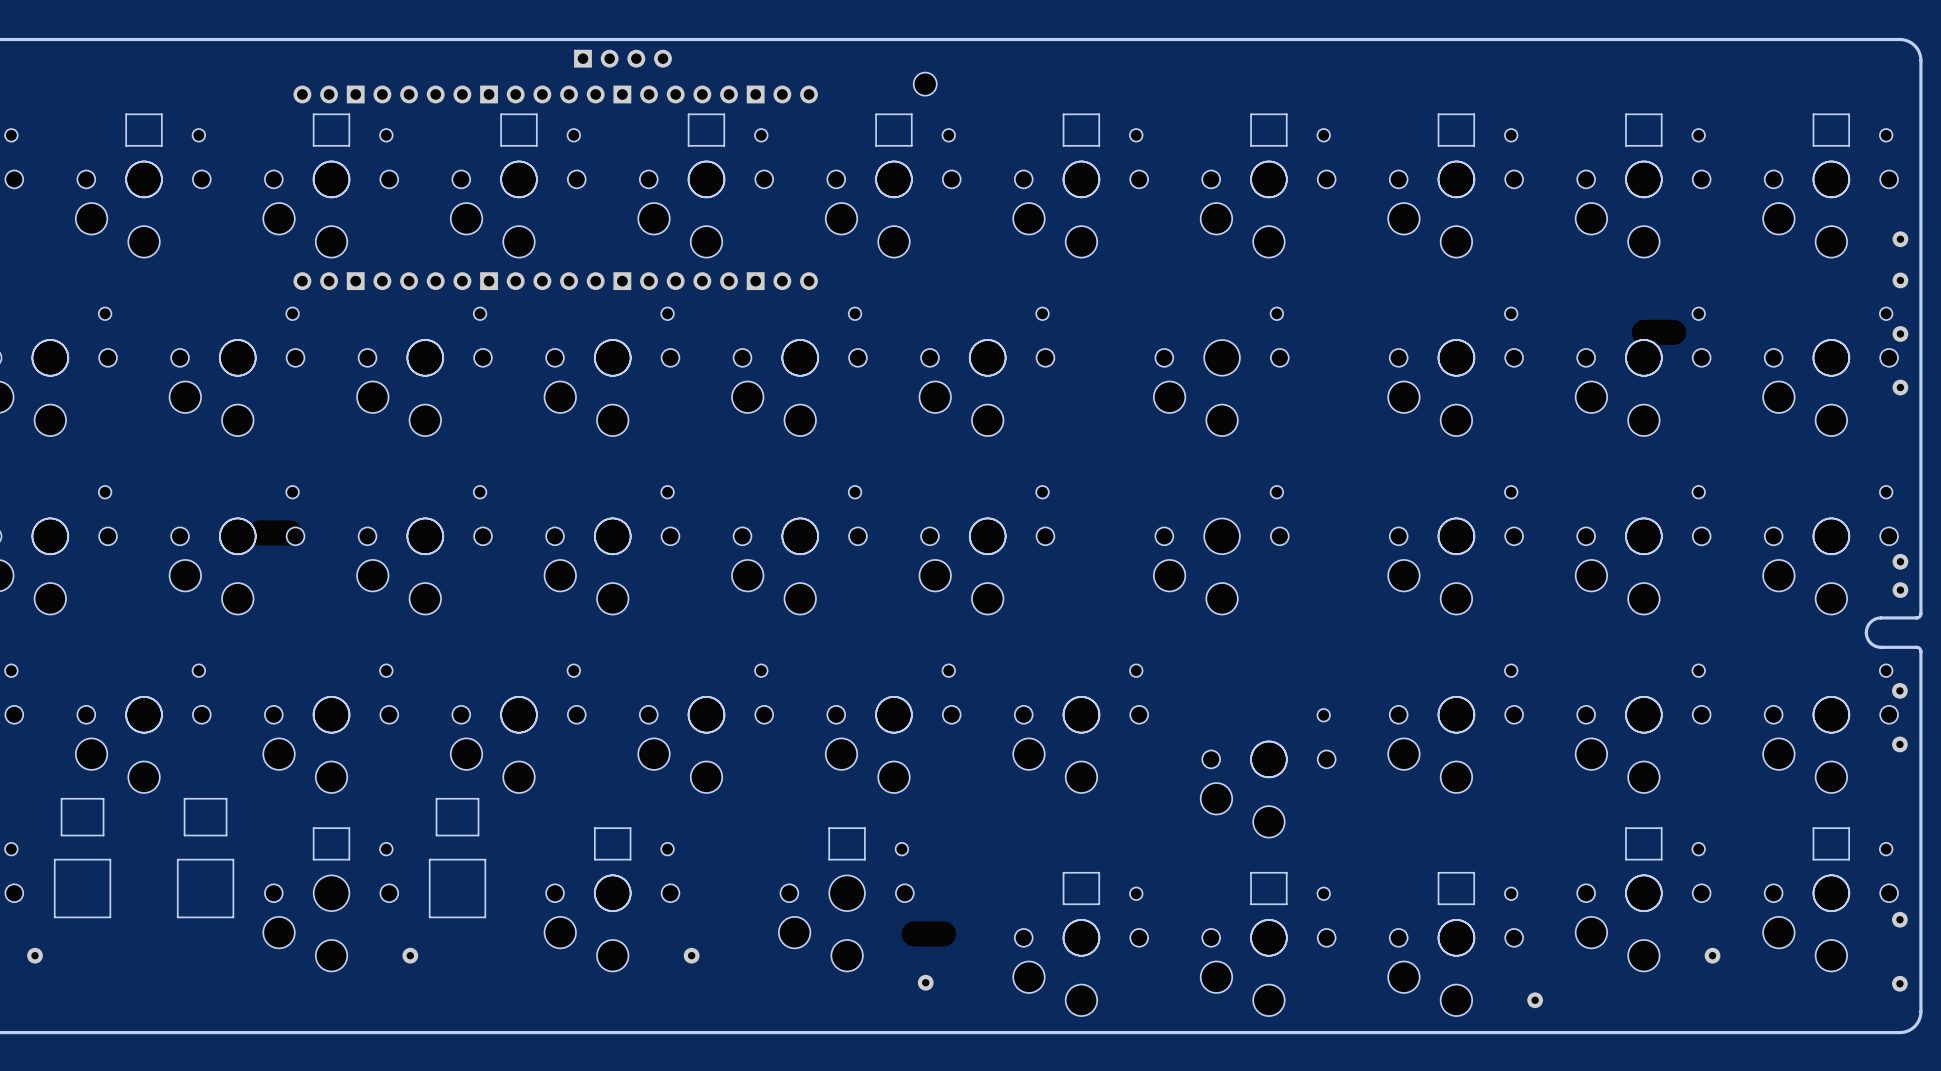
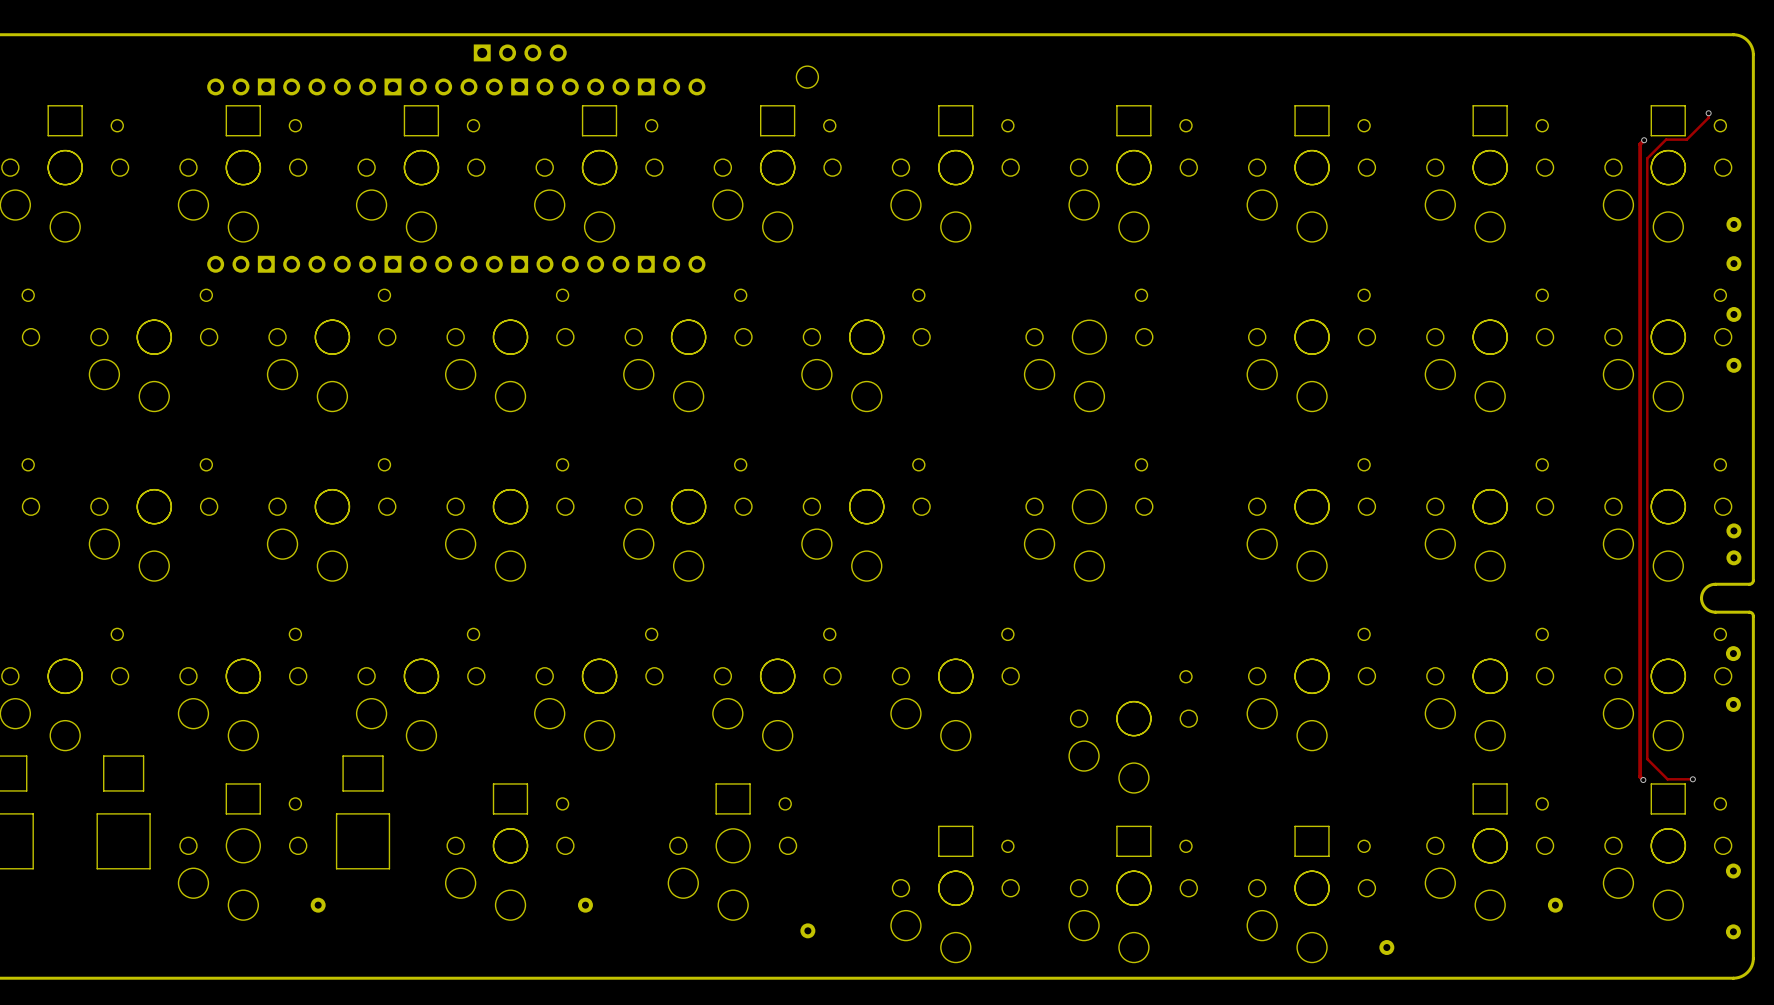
track: none -> (1708, 113) (1708, 117) (1686, 139) (1666, 139) (1647, 158) (1647, 759) (1667, 779) (1692, 779)
via: none -> (1708, 113)
track: none -> (1644, 140) (1640, 144) (1640, 776) (1643, 780)
via: none -> (1644, 140)
via: none -> (1643, 780)
via: none -> (1692, 779)

